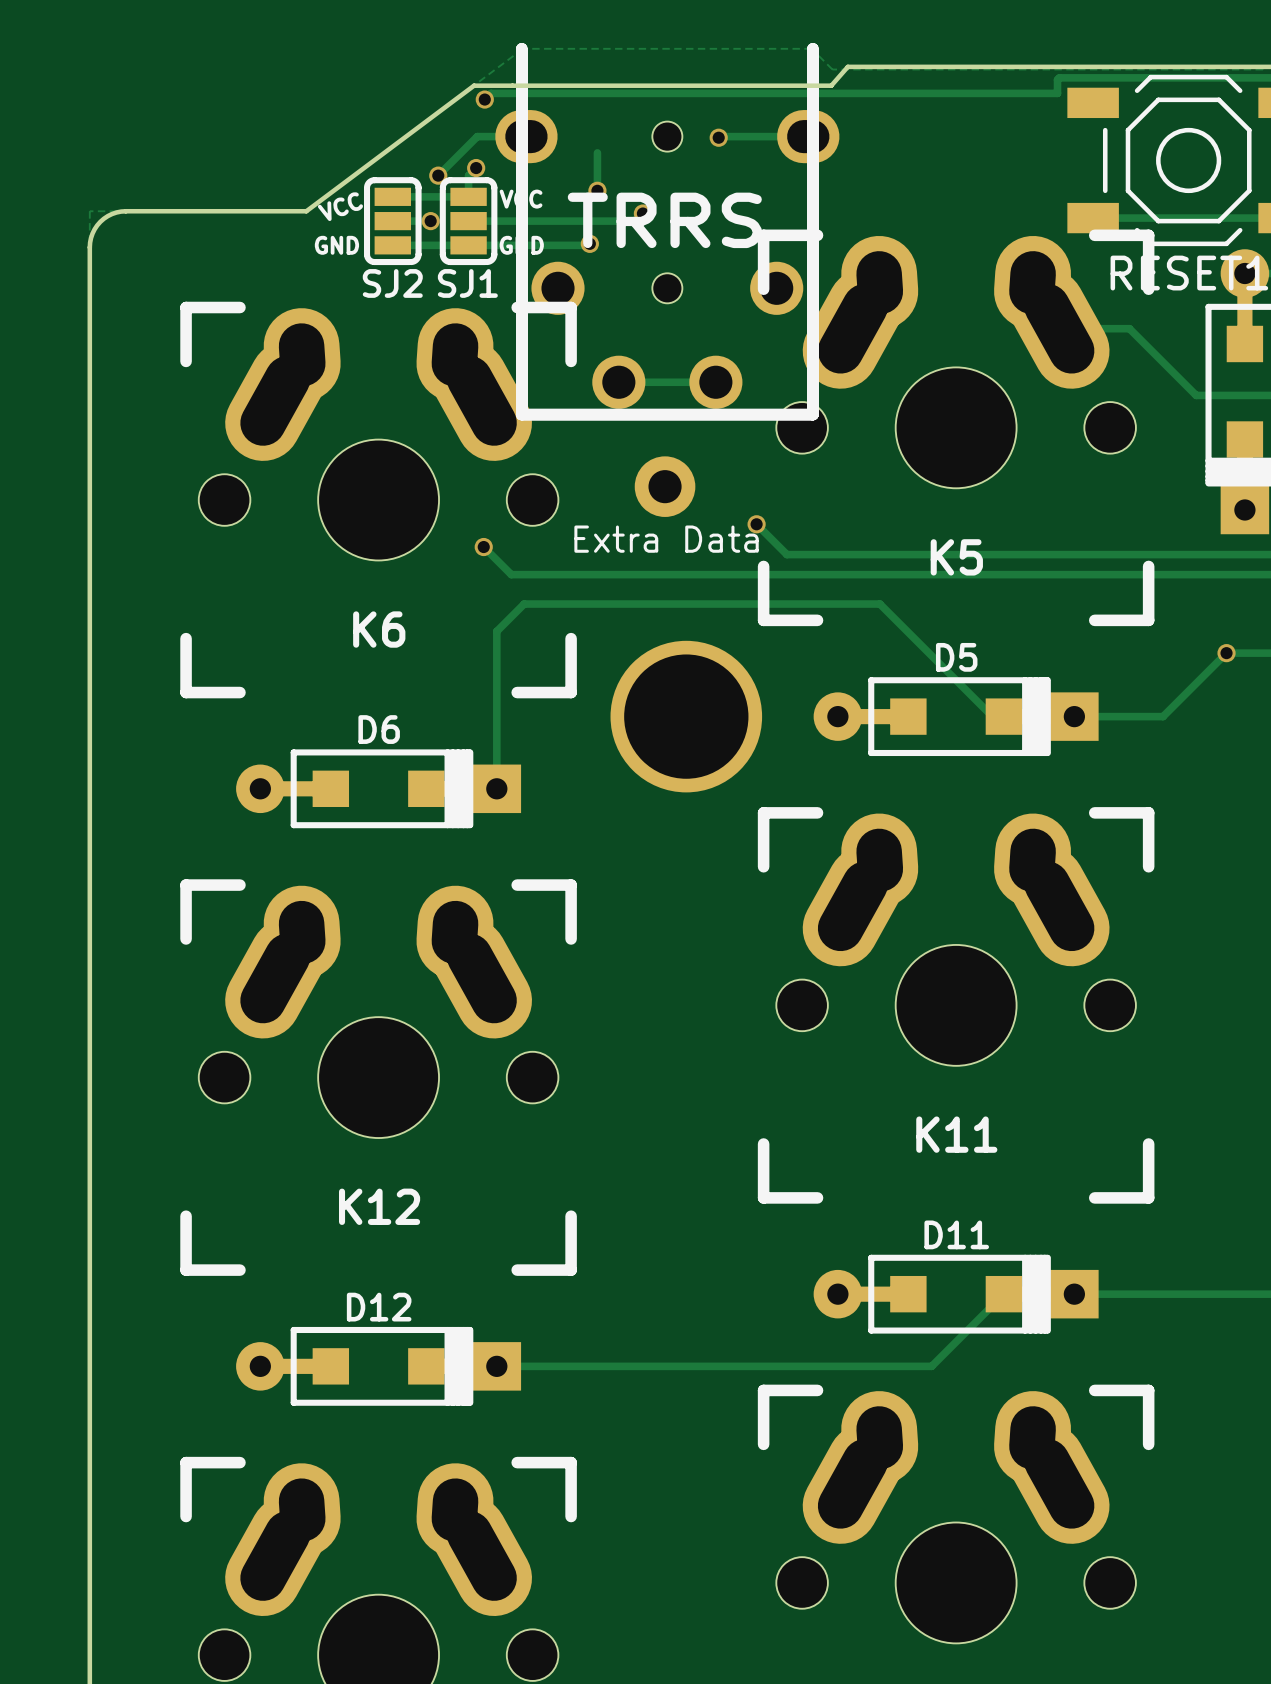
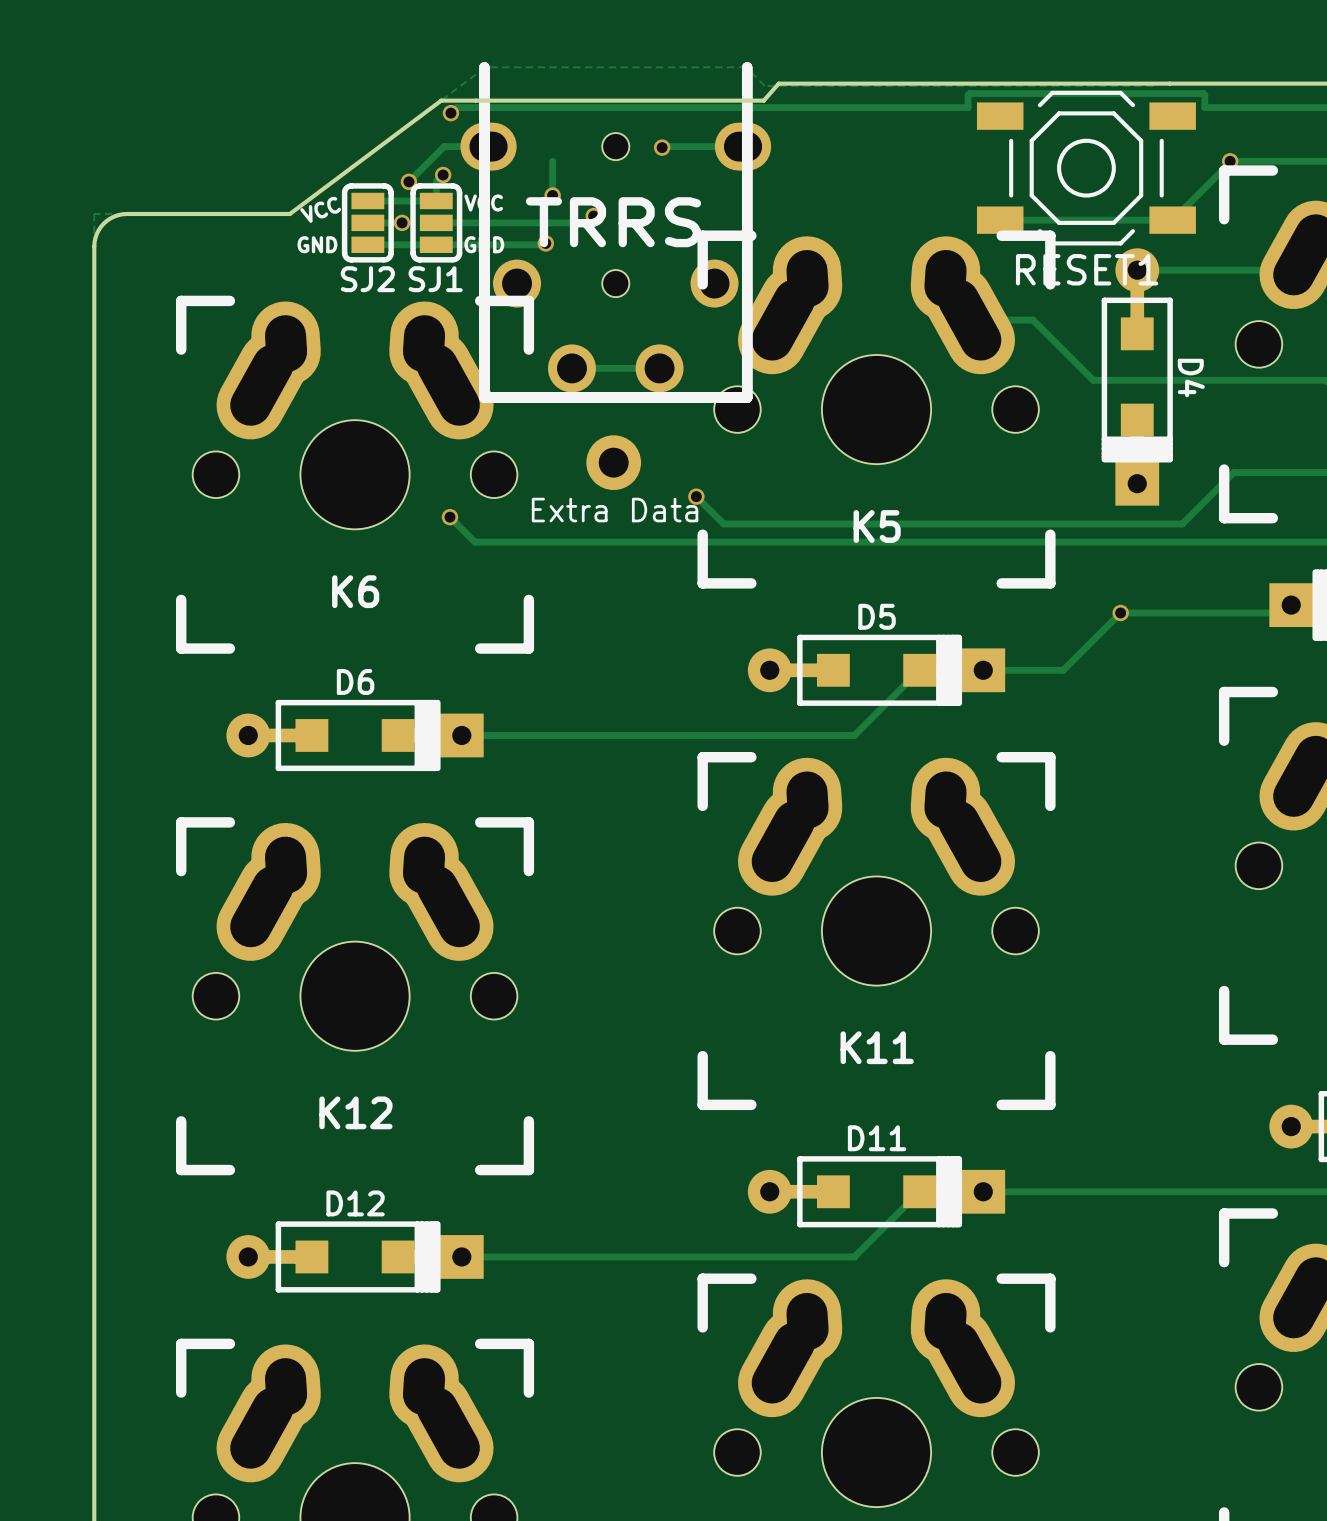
part: (686, 716) -> none
track: (1037, 716) (992, 716) (879, 604) (524, 604) (496, 631) (496, 788) -> (919, 670) (854, 735) (461, 735)

